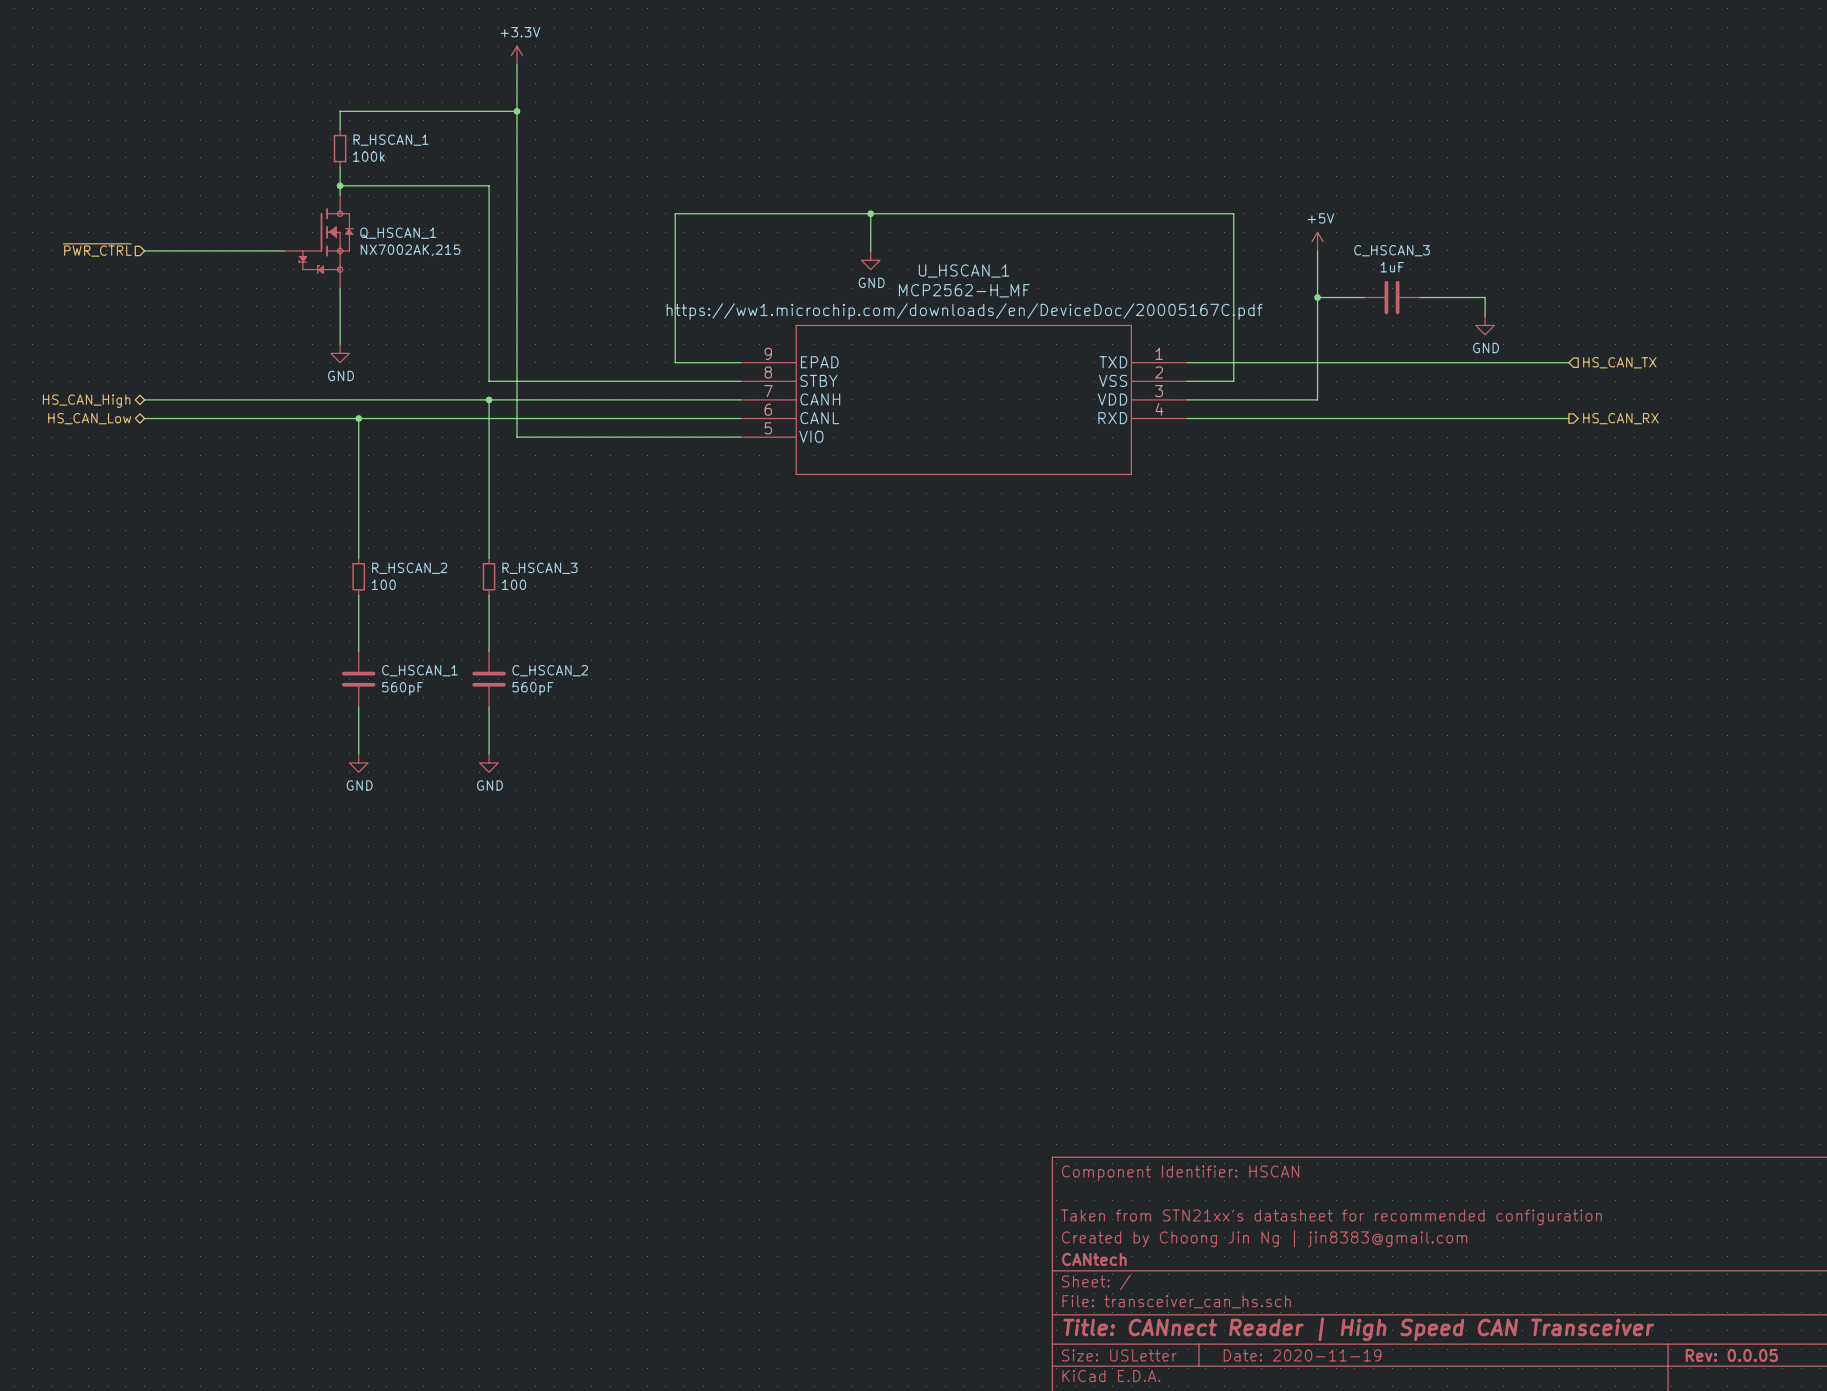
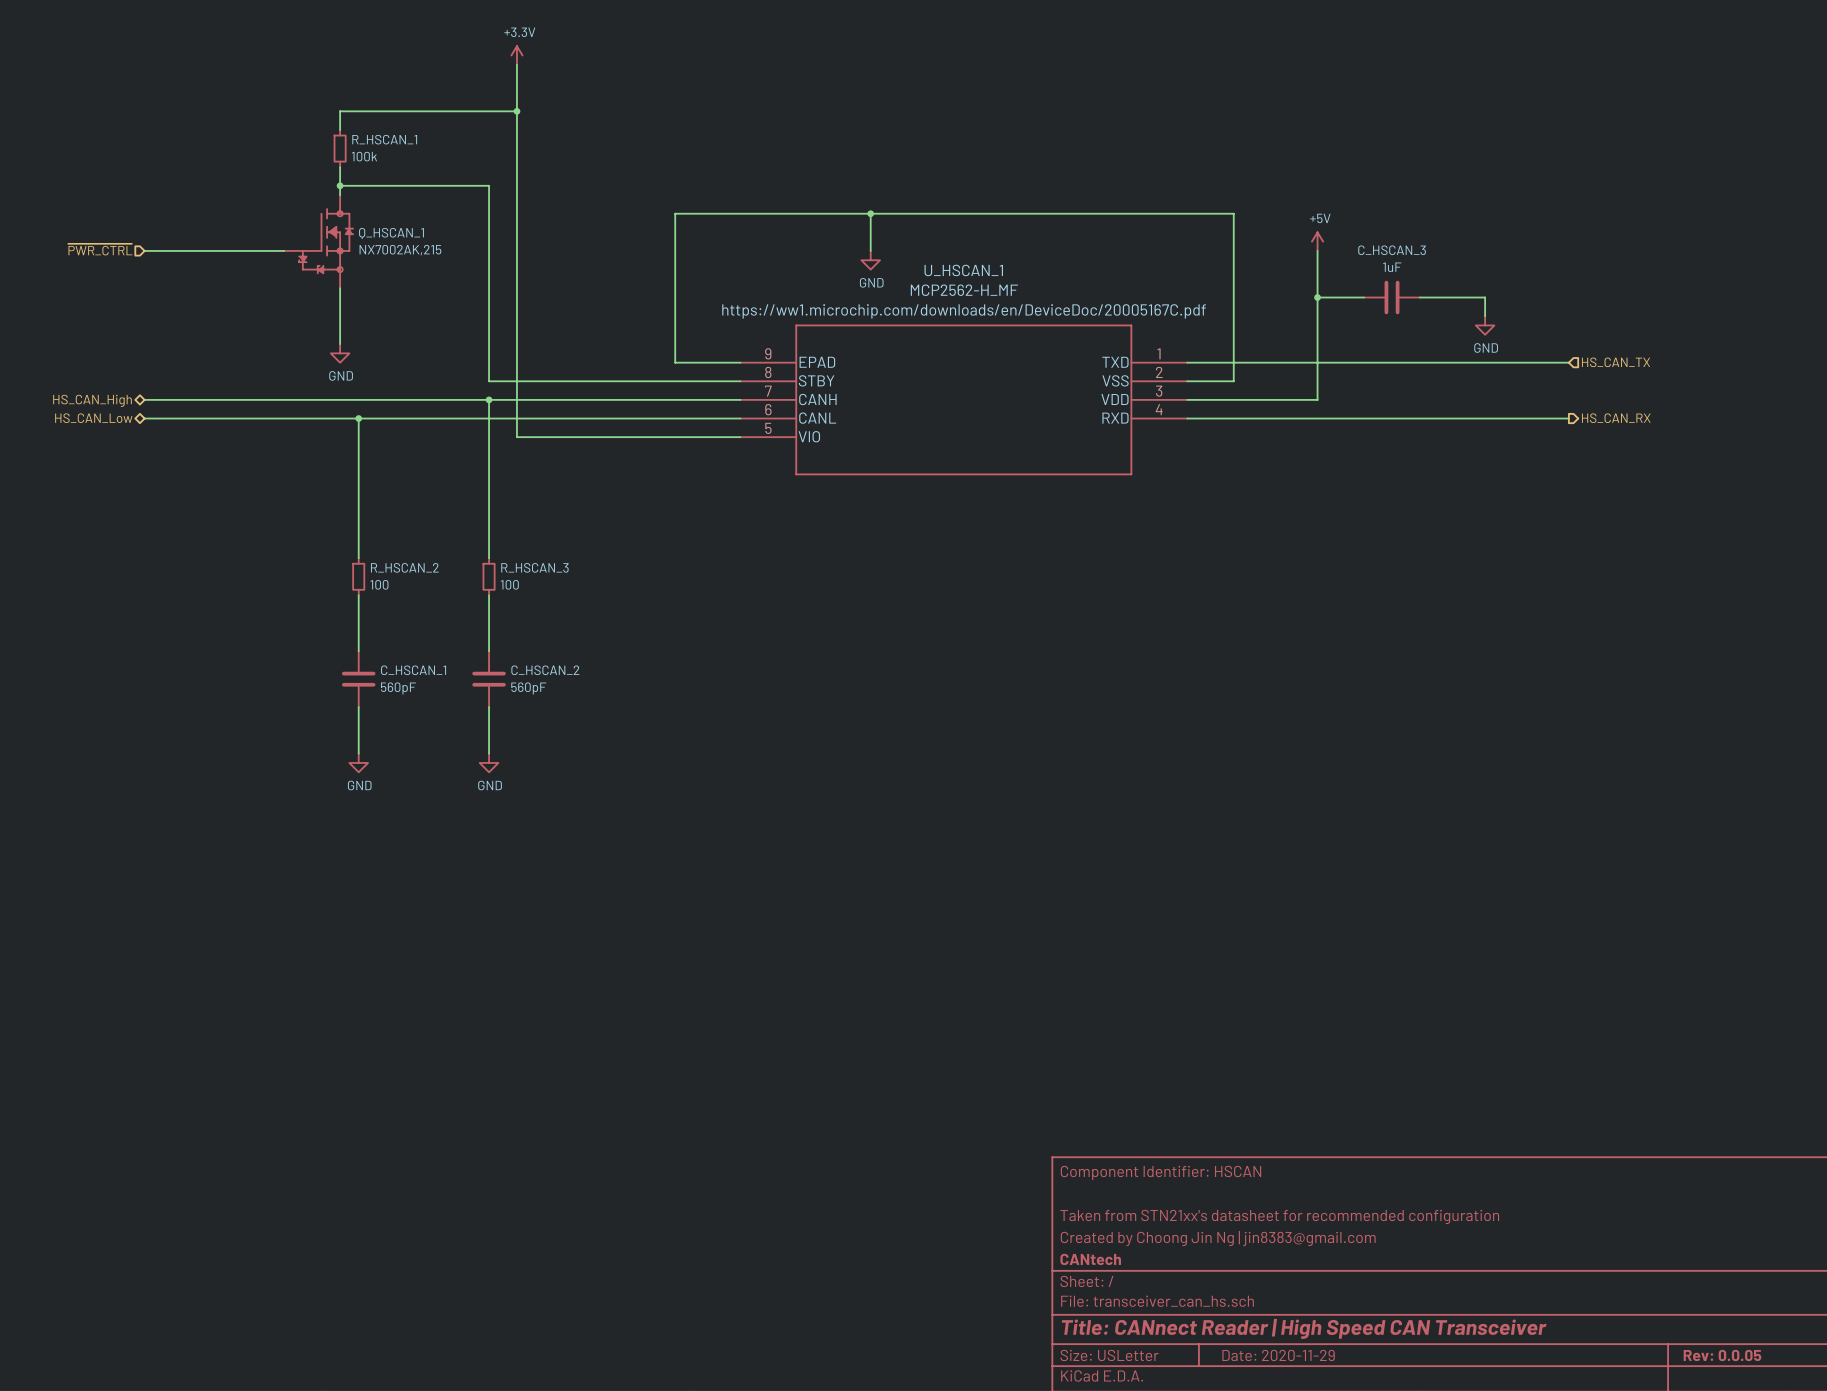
title block: Date: 2020-11-19 (1302, 1355) -> Date: 2020-11-29 (1278, 1355)

